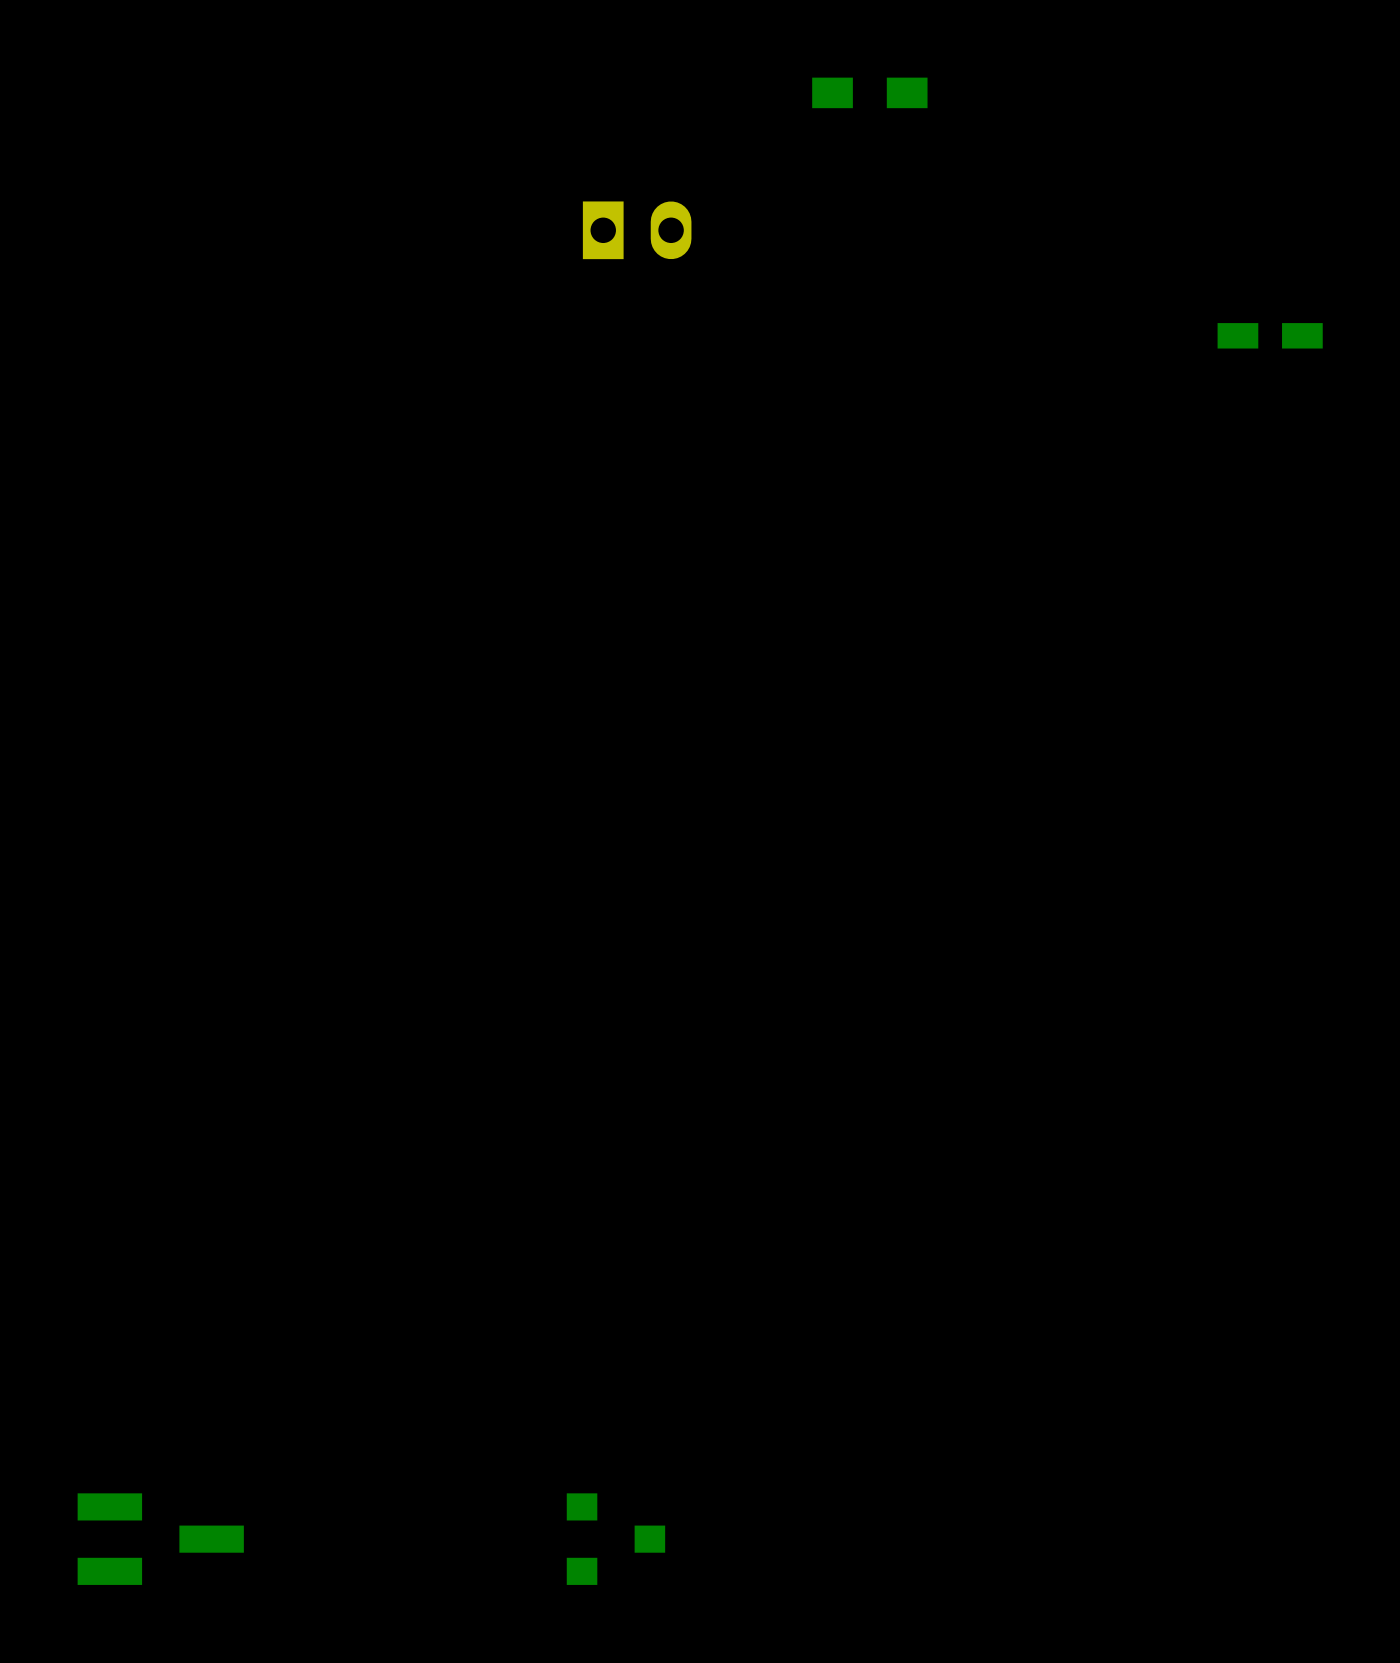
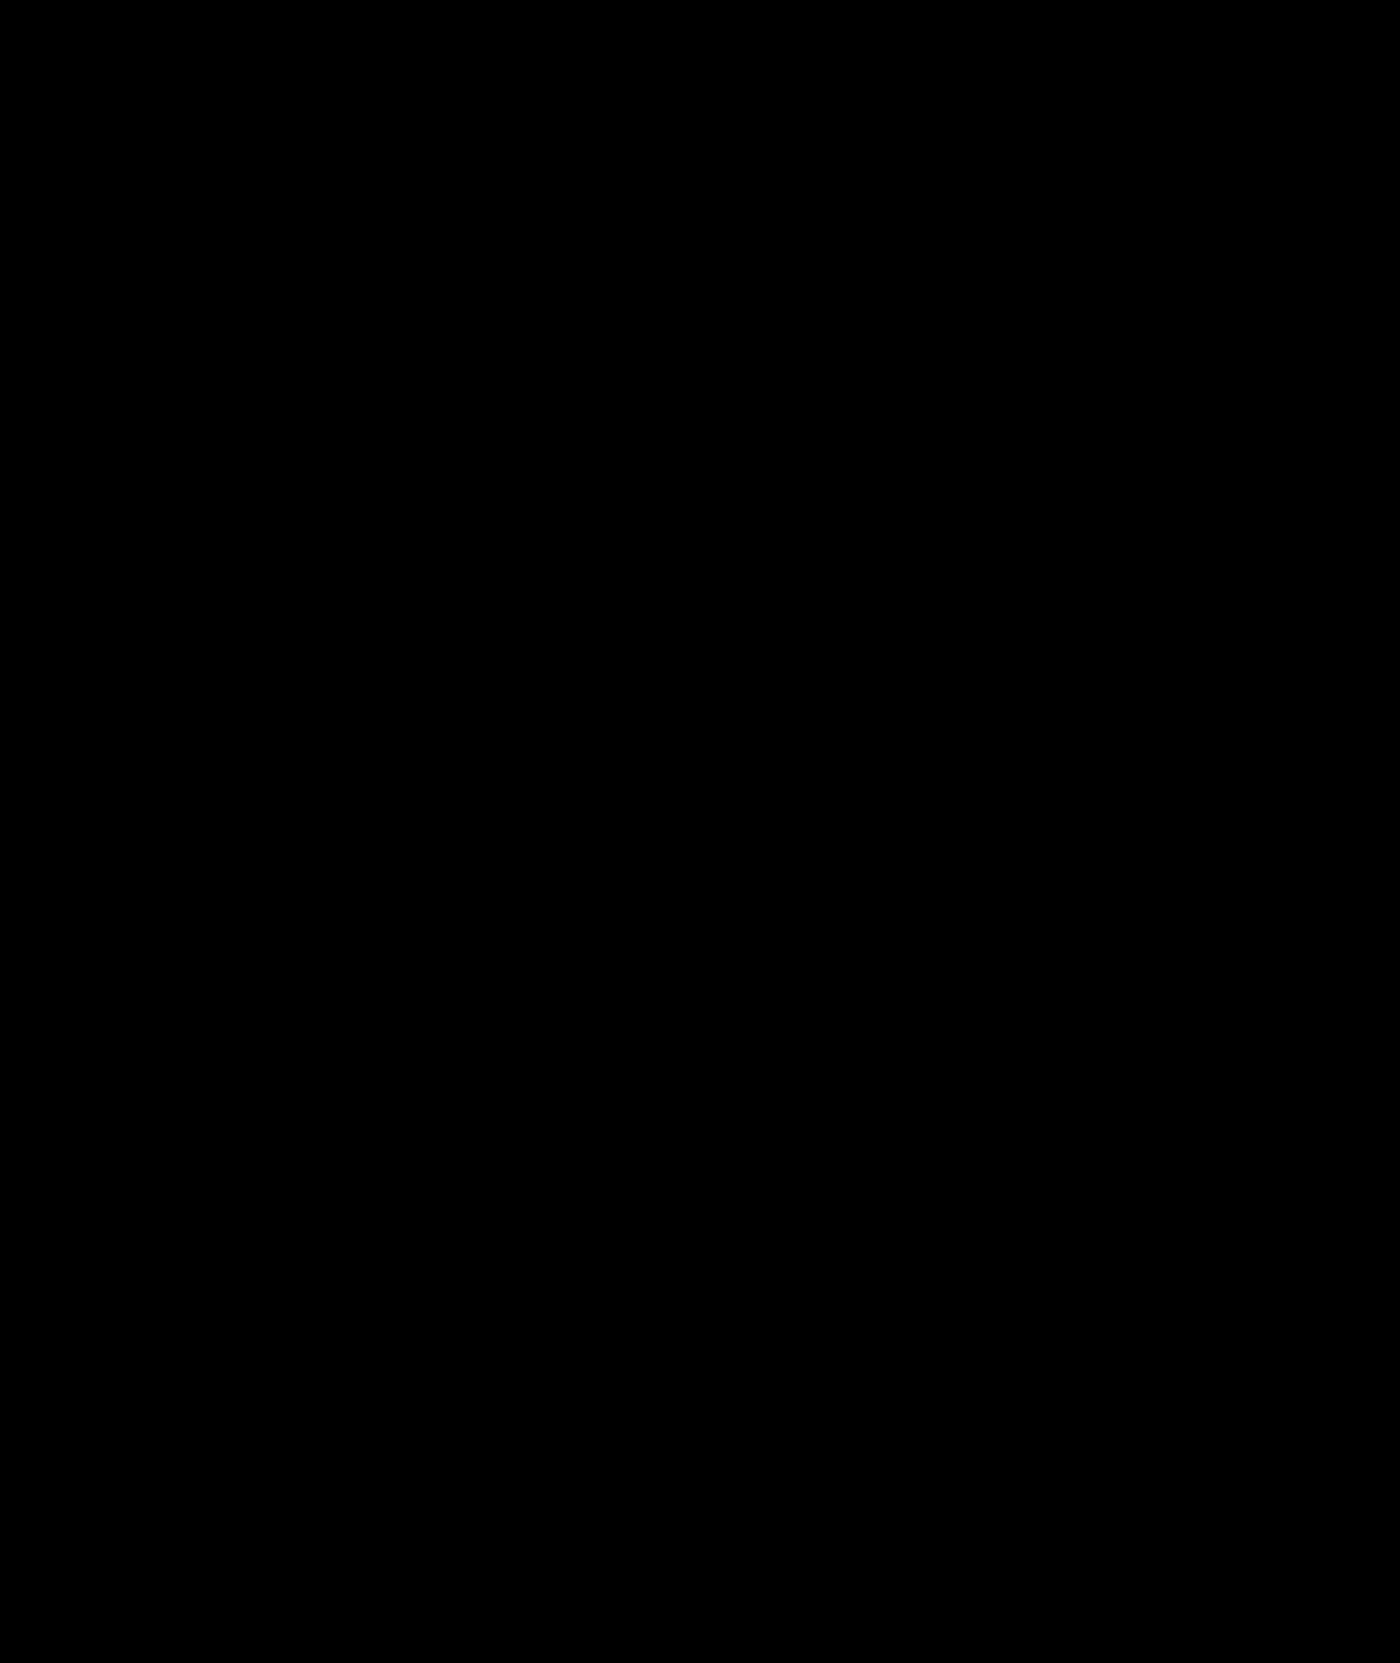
part: (869, 92) -> none
part: (637, 230) -> none
part: (1270, 335) -> none
part: (160, 1539) -> none
part: (615, 1539) -> none

